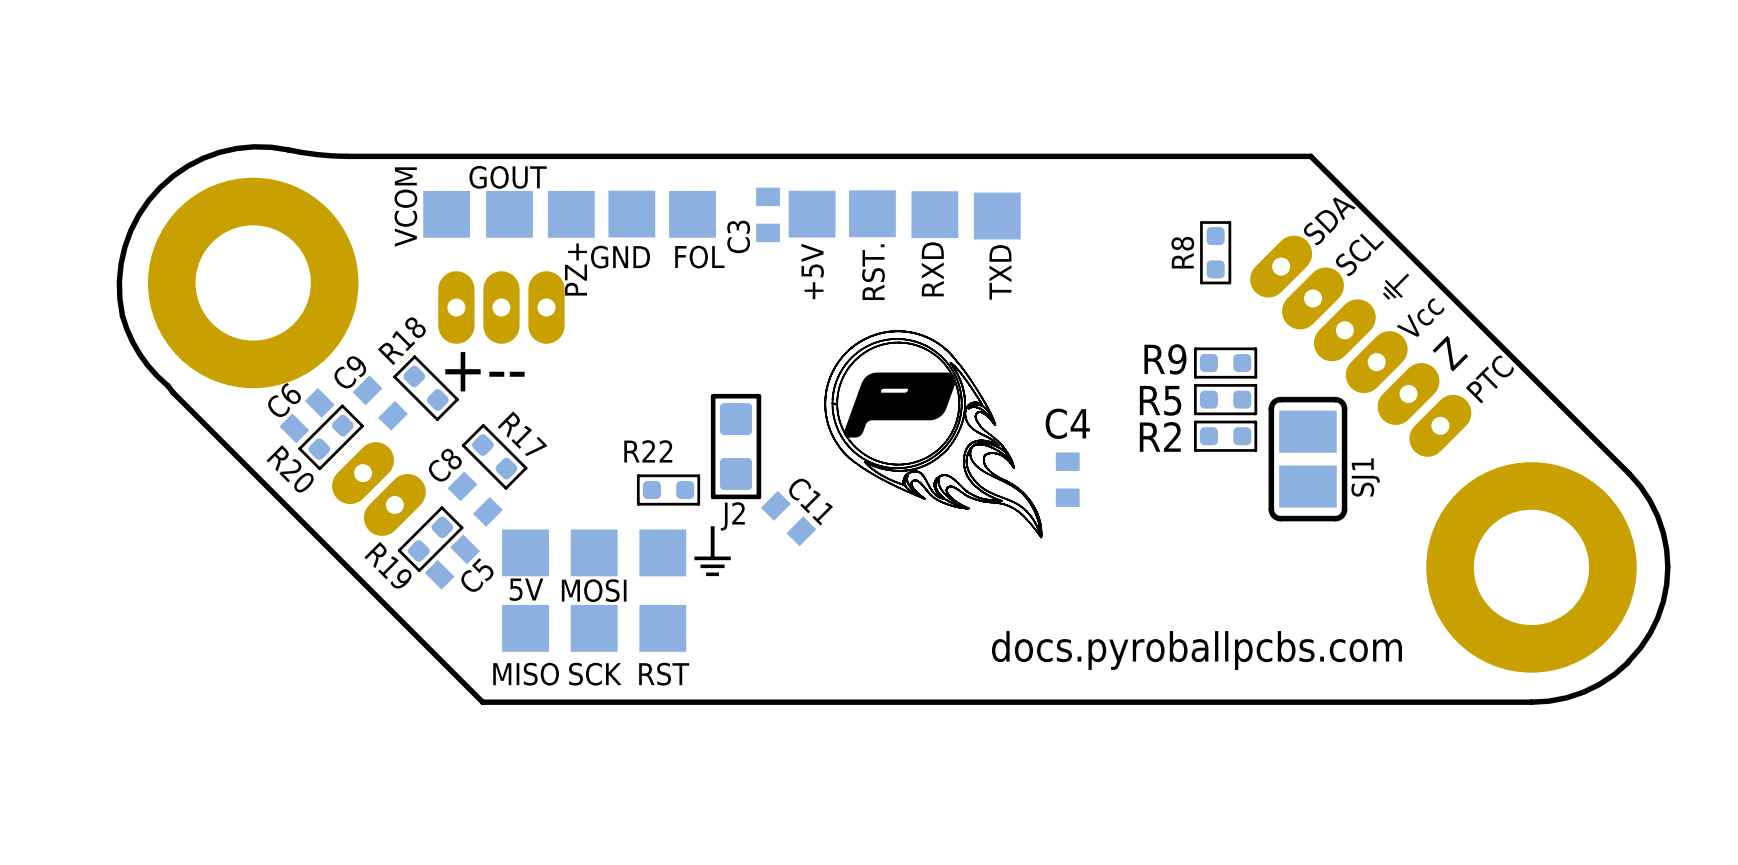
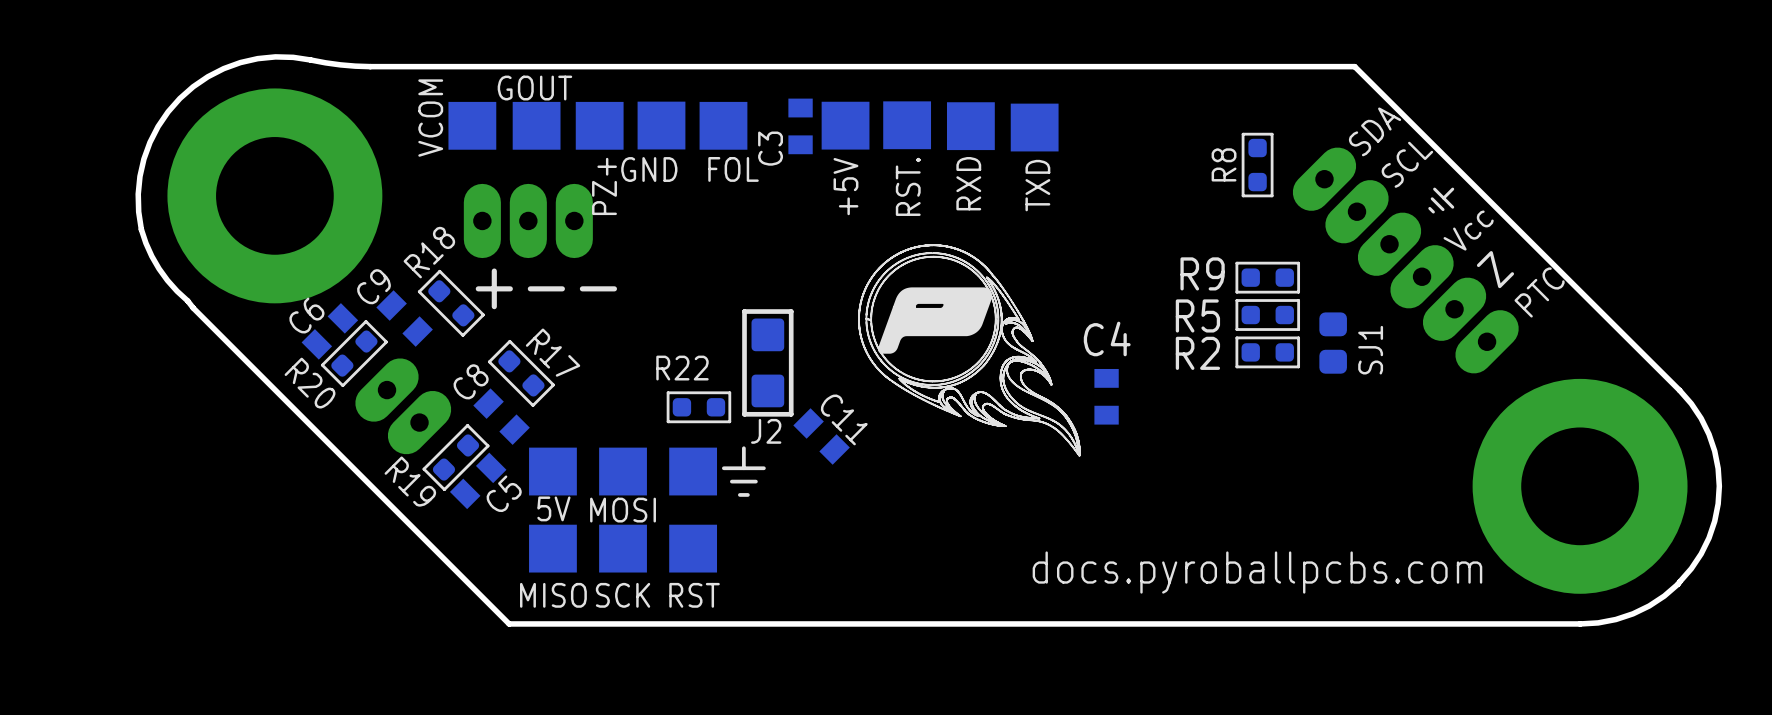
SJ1 footprint: [1268, 396, 1348, 522] -> [1319, 312, 1347, 374]

